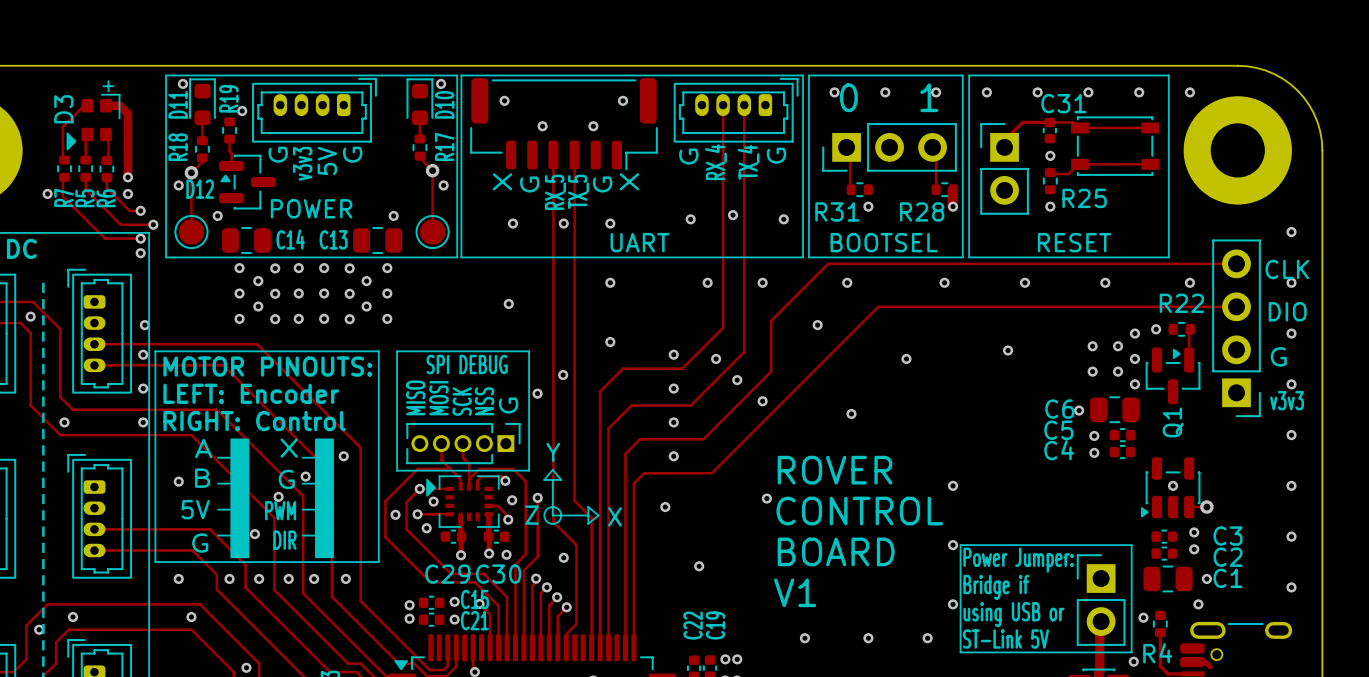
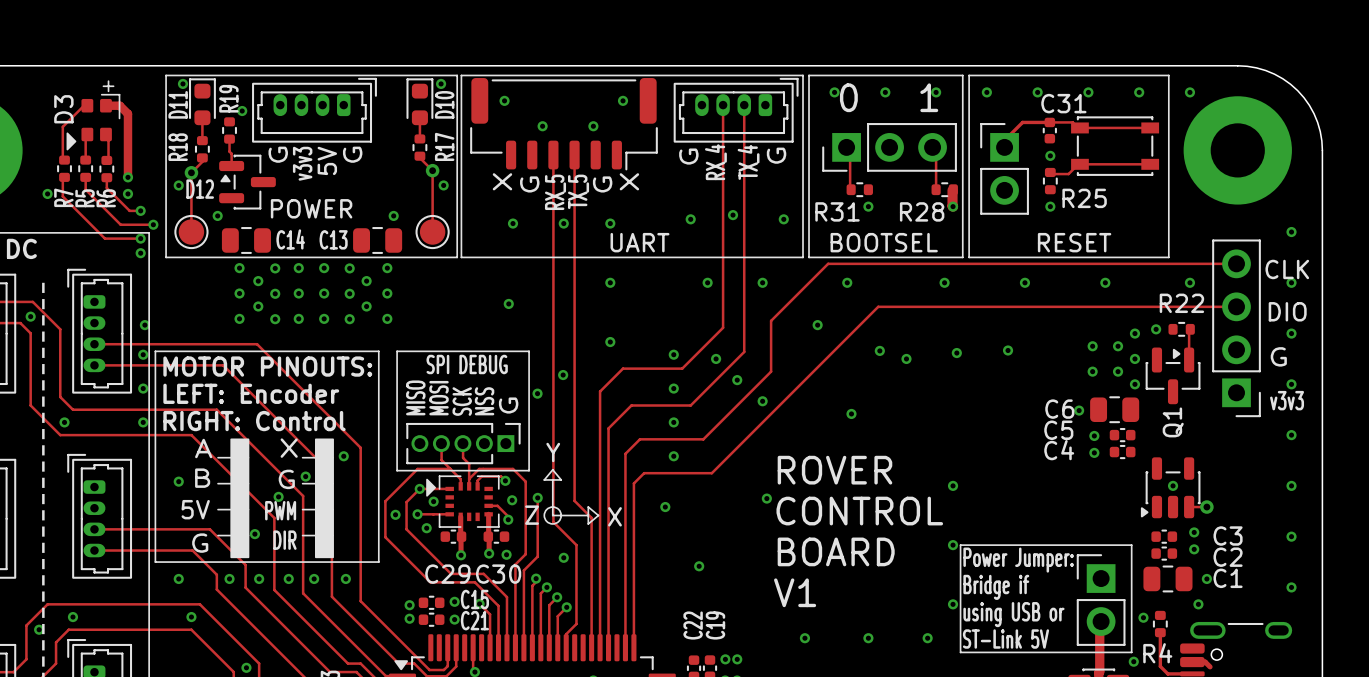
via: none -> (879, 350)
via: none -> (956, 353)

